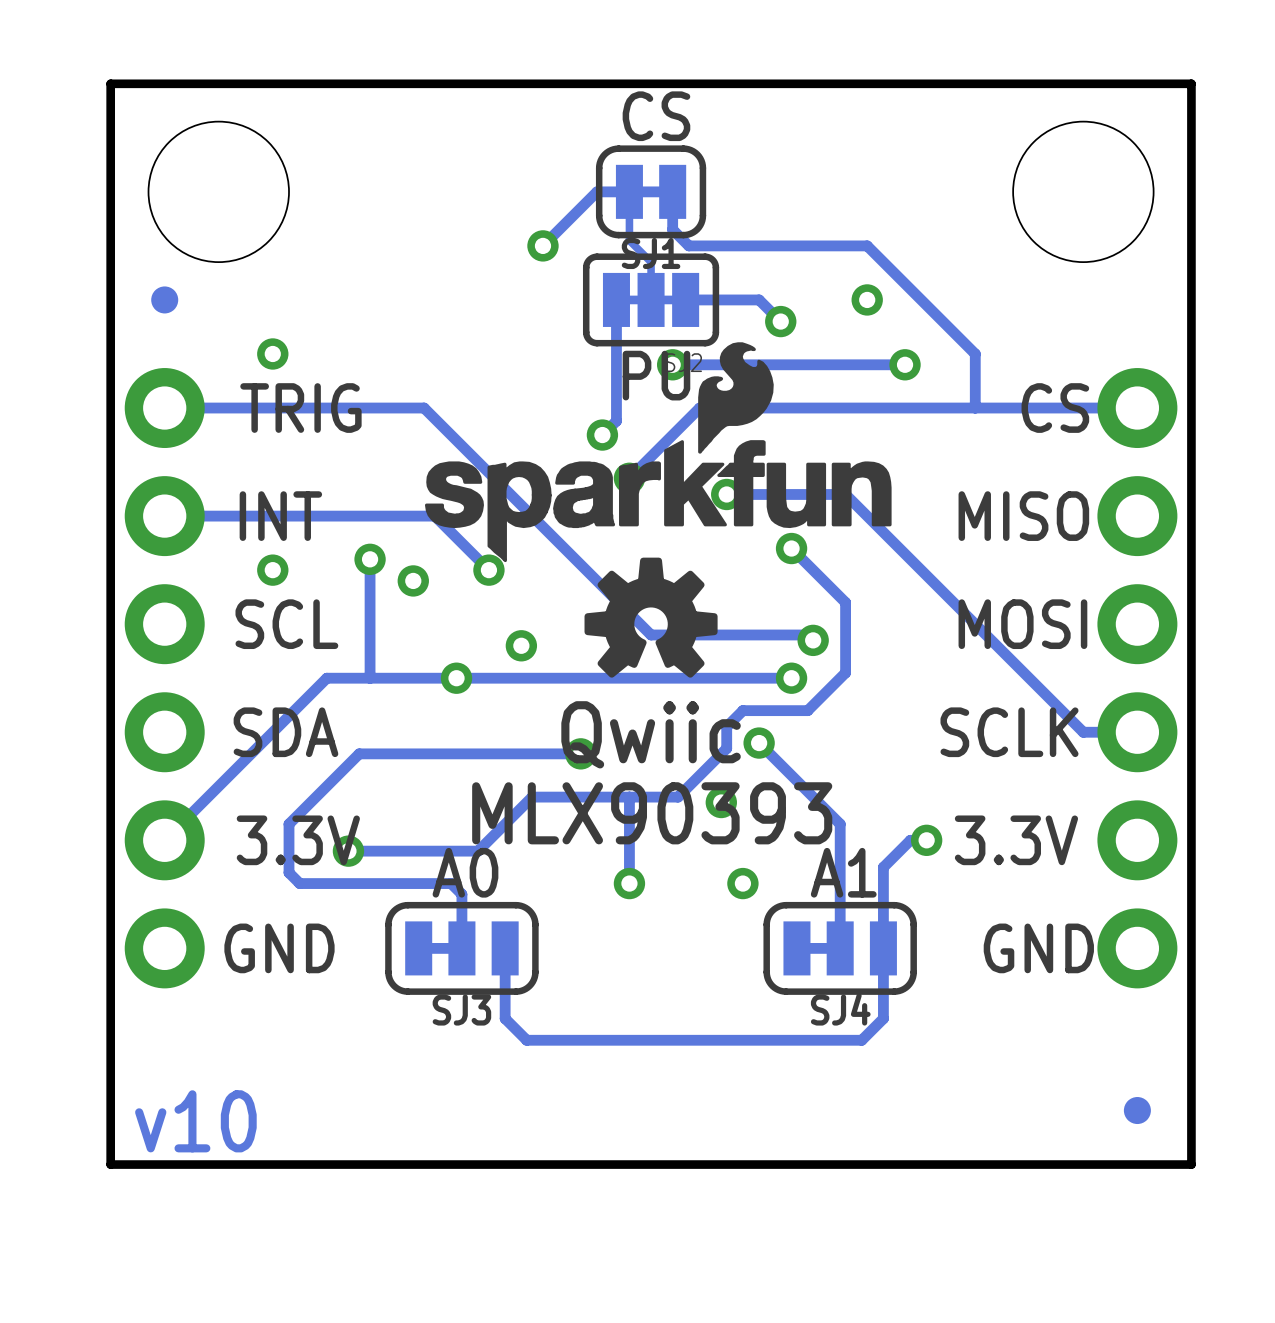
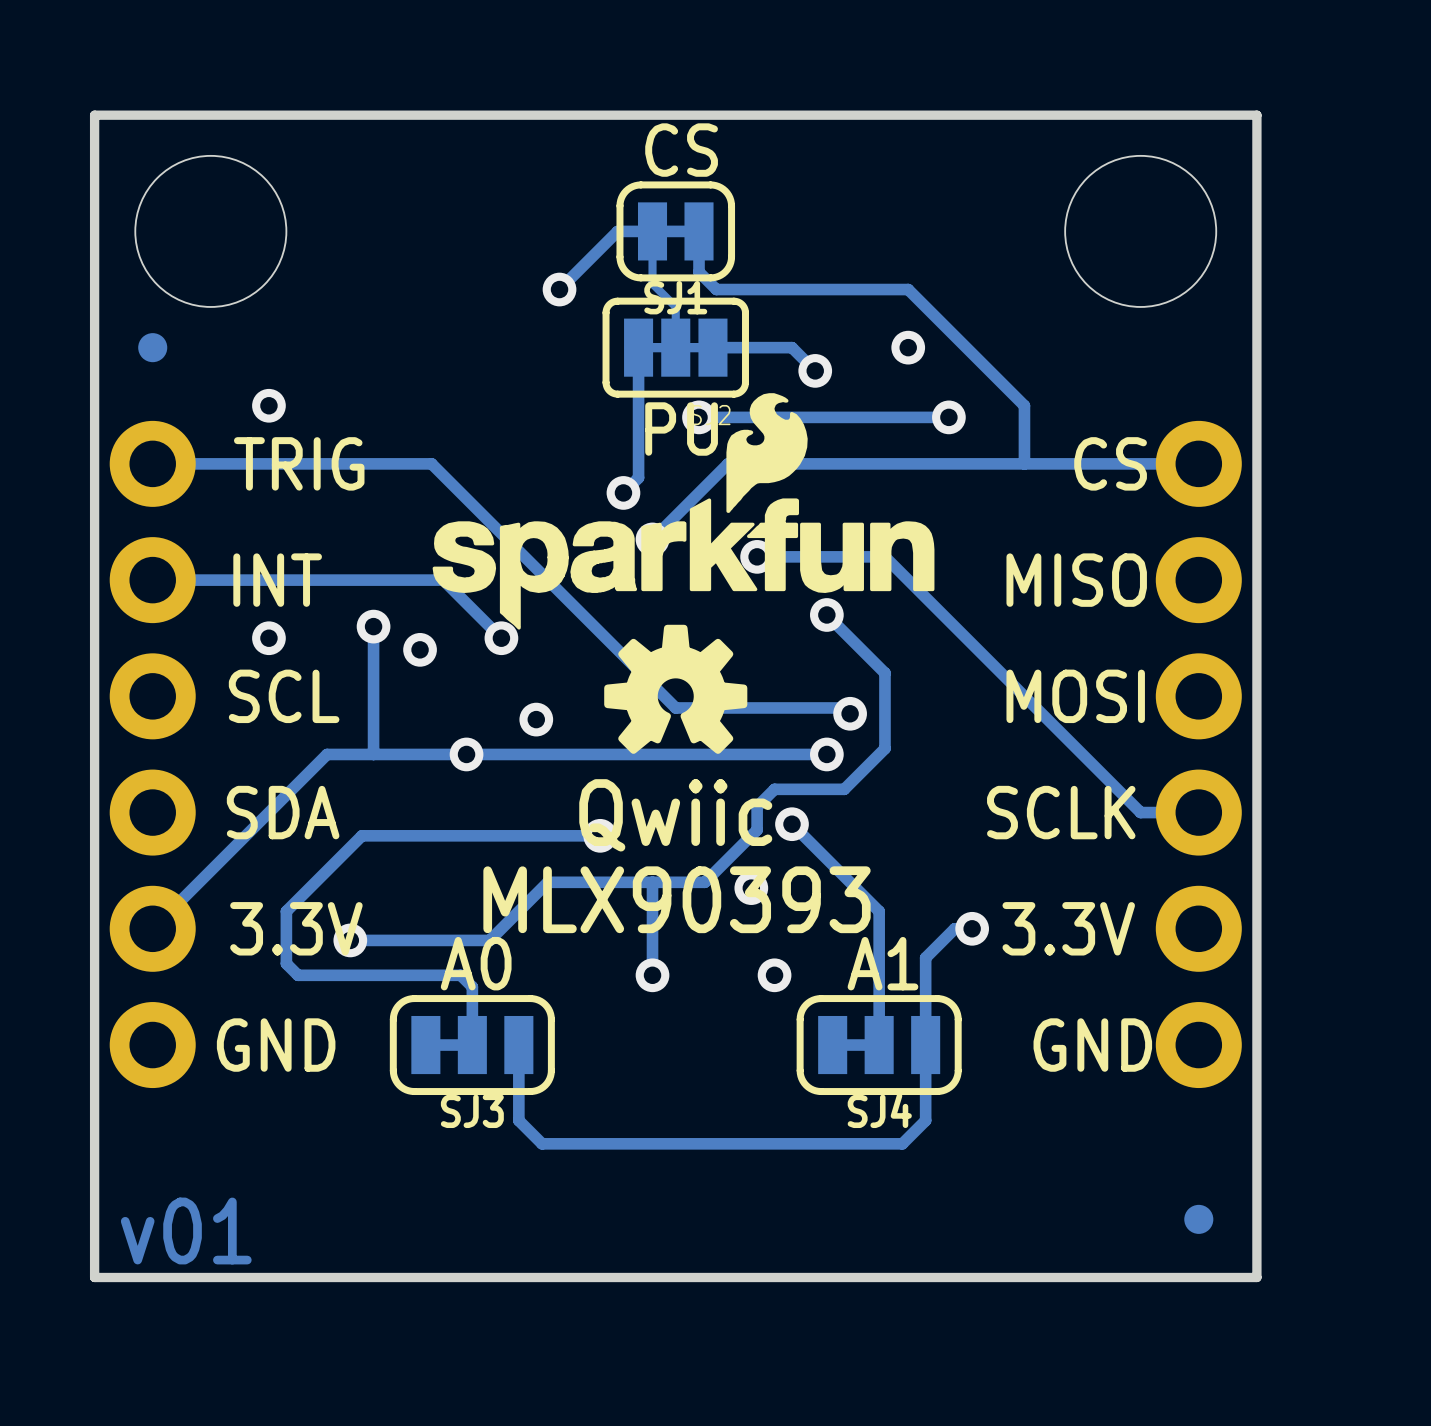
text: v10 (195, 1121) -> v01 (186, 1231)

